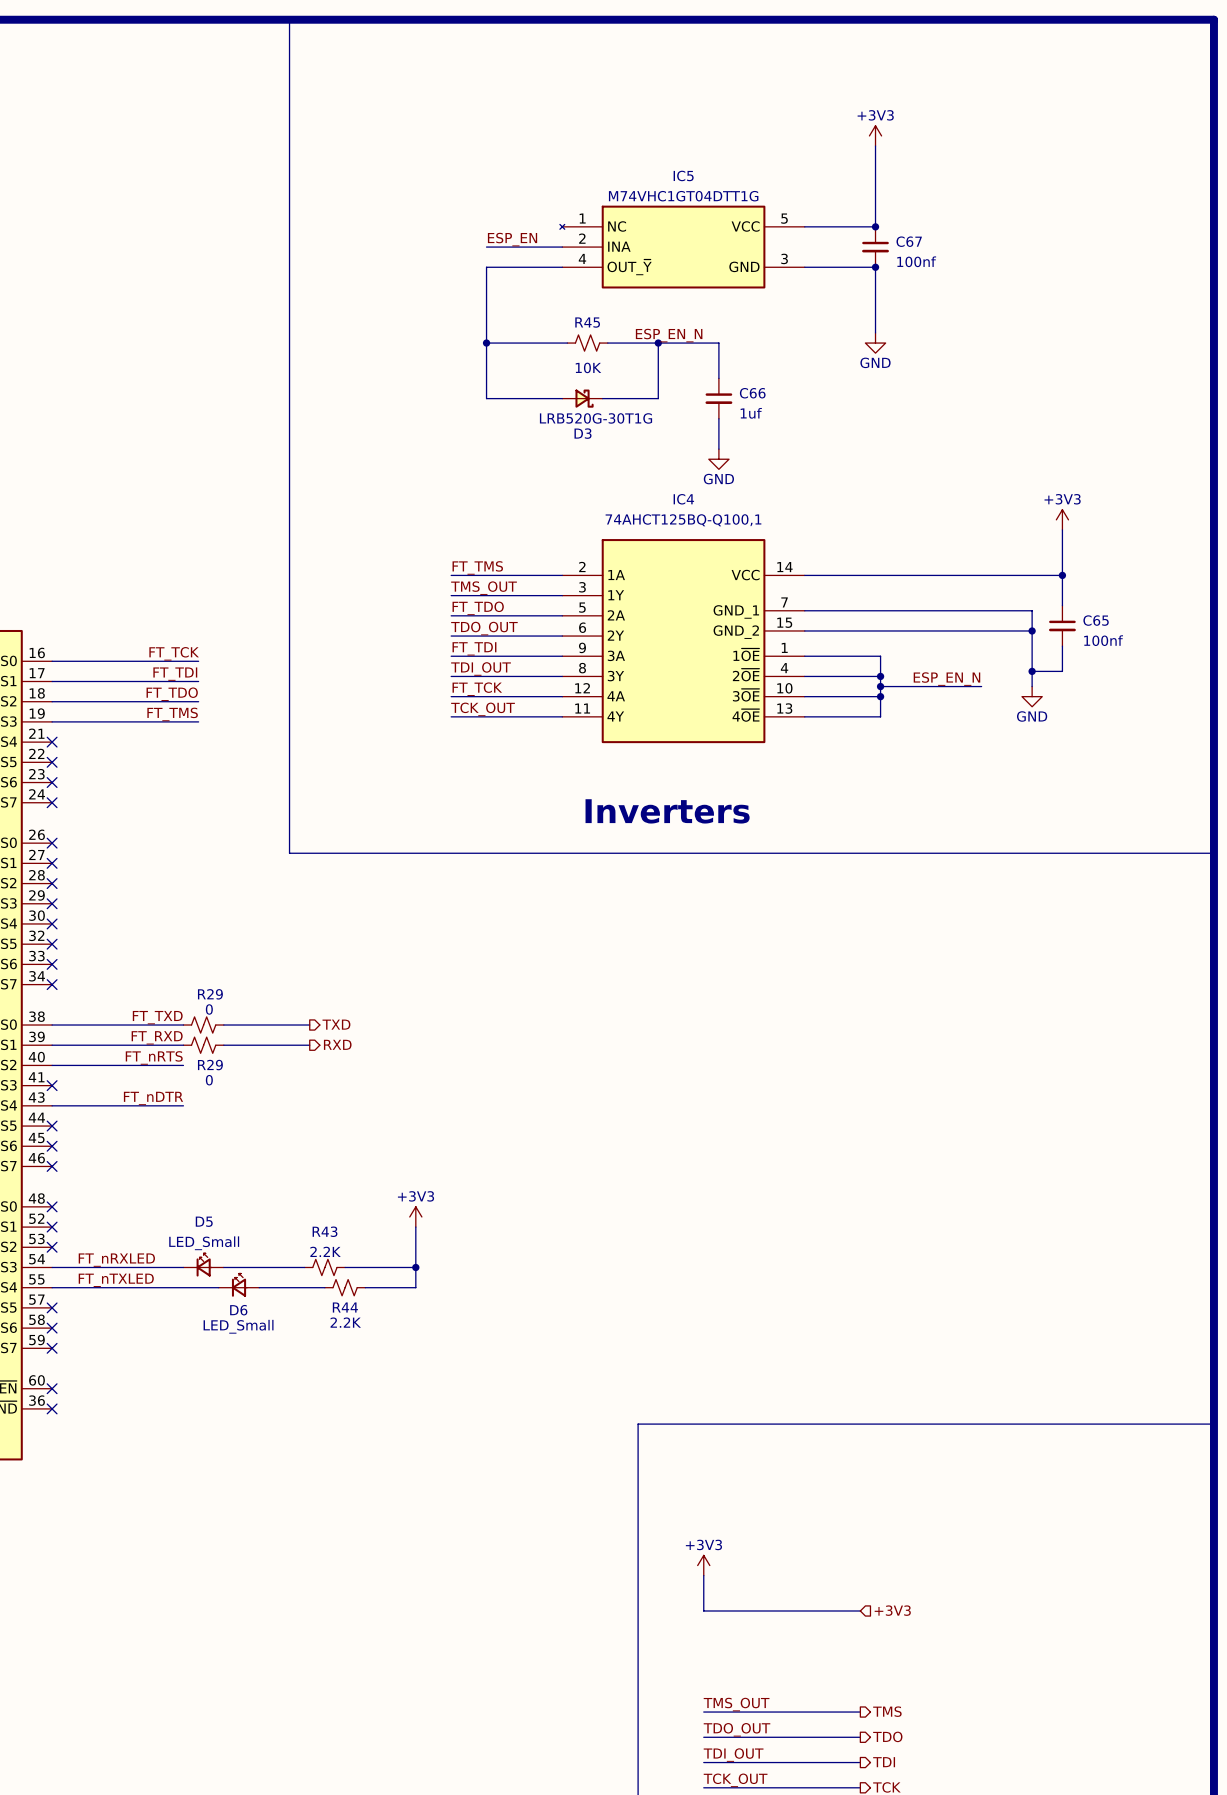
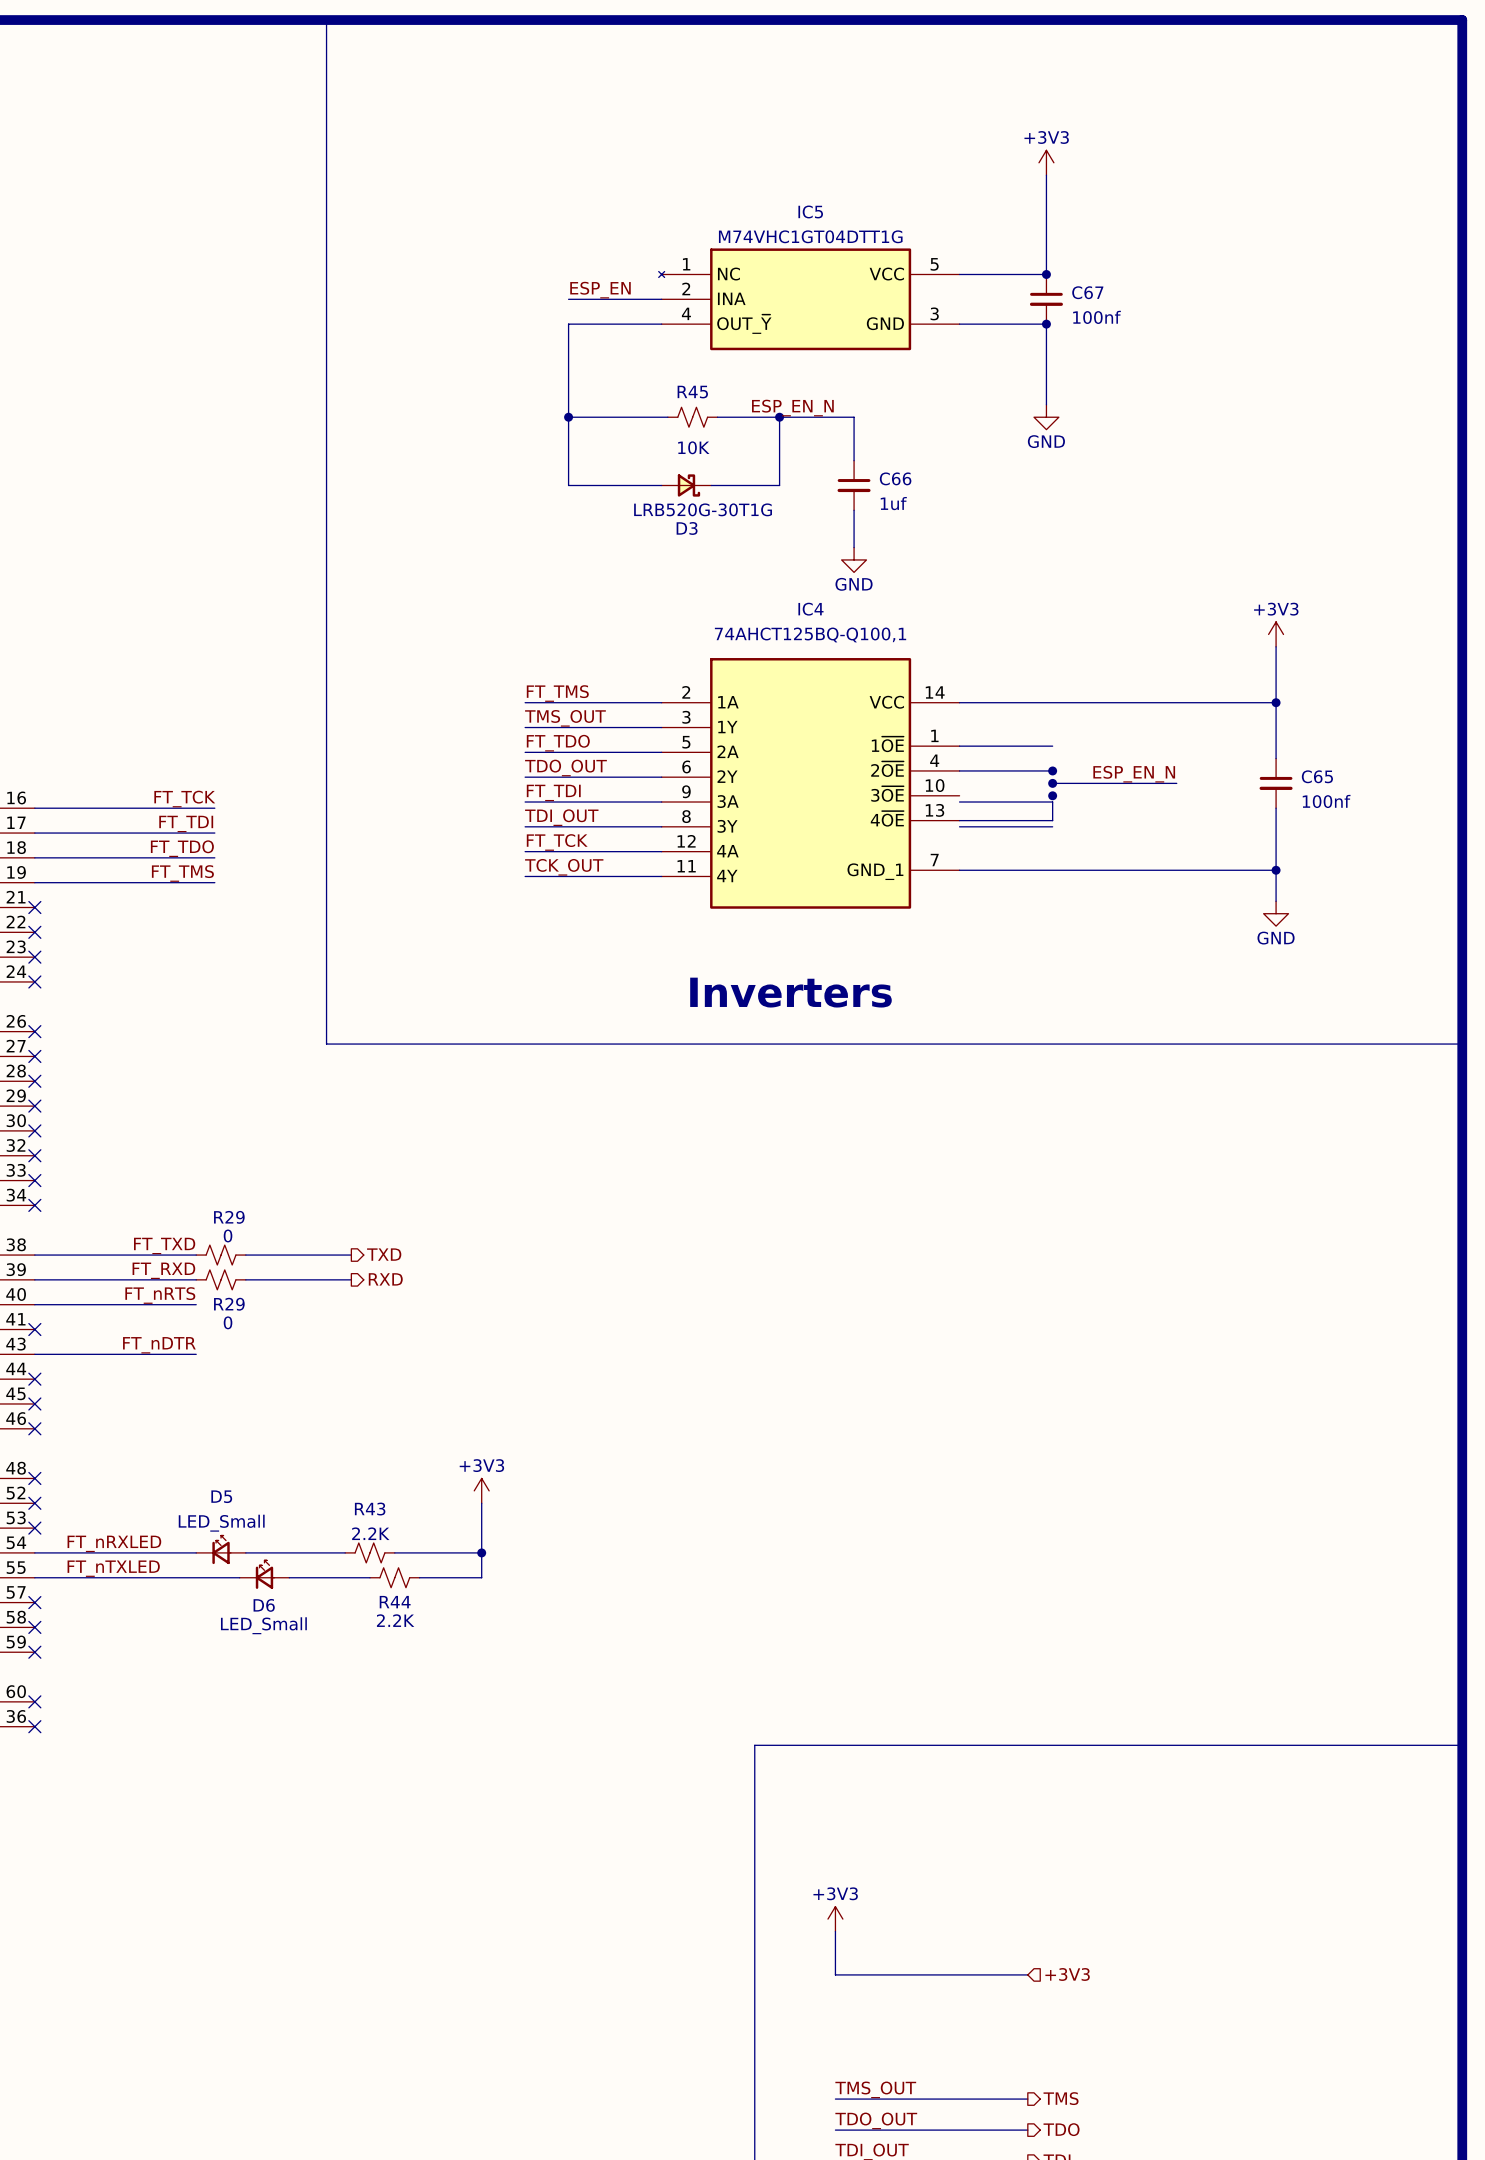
IC4 symbol: [562, 539, 805, 744] -> [661, 658, 960, 909]
wire: (880, 610) (1032, 610) (1032, 686) -> none
C65 position: (1062, 625) -> (1276, 783)
wire: (880, 630) (1032, 630) -> none
junction: none -> (1052, 770)
junction: (1032, 630) -> none
junction: none -> (1052, 783)
junction: none -> (1052, 795)
wire: (880, 671) (880, 716) (804, 716) -> (1052, 820) (959, 820)
wire: (1032, 671) (1062, 671) -> (1276, 901) (1276, 820)
junction: (1032, 671) -> none
junction: (880, 676) -> none
label position: ESP_EN_N (946, 679) -> ESP_EN_N (1134, 774)
wire: (880, 686) (981, 686) -> (1052, 783) (1176, 783)
junction: (880, 686) -> none
wire: (804, 696) (880, 696) -> none
junction: (880, 696) -> none
power symbol position: GND (1032, 696) -> GND (1276, 913)
wire: none -> (959, 870) (1276, 870)
junction: none -> (1276, 870)

